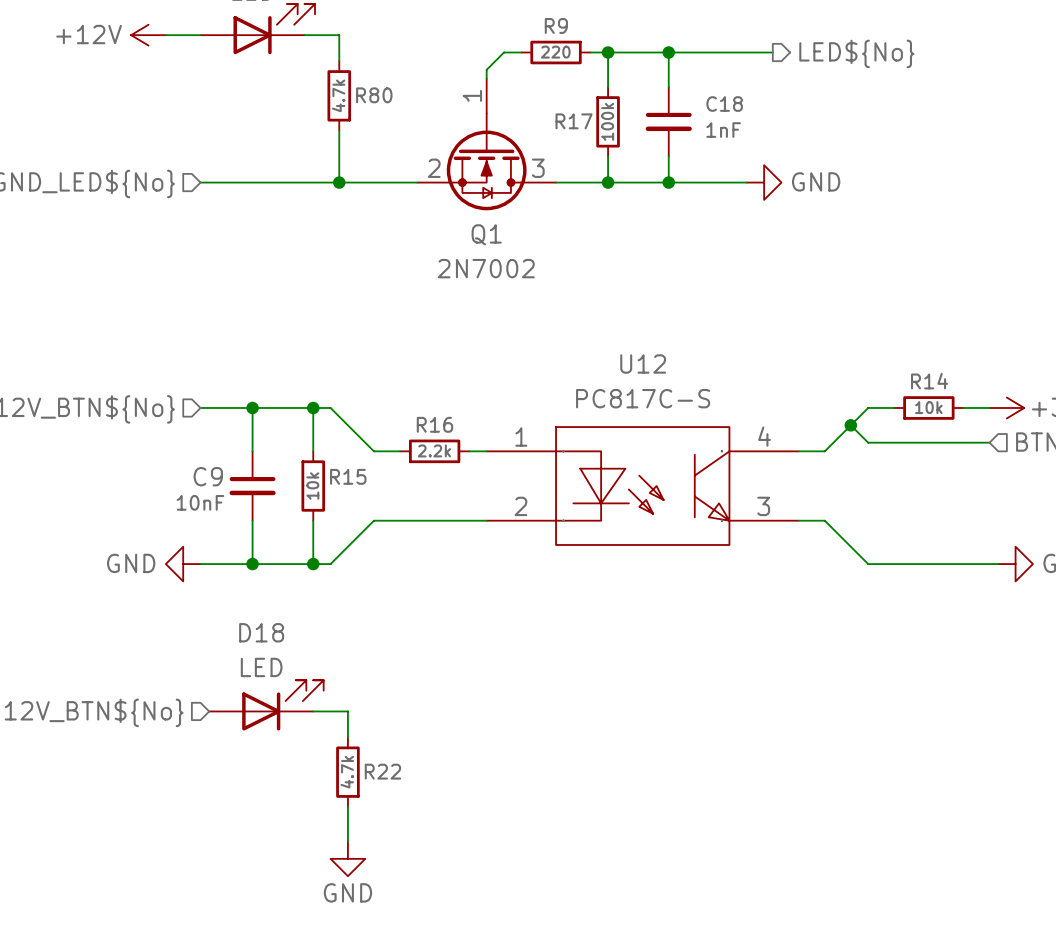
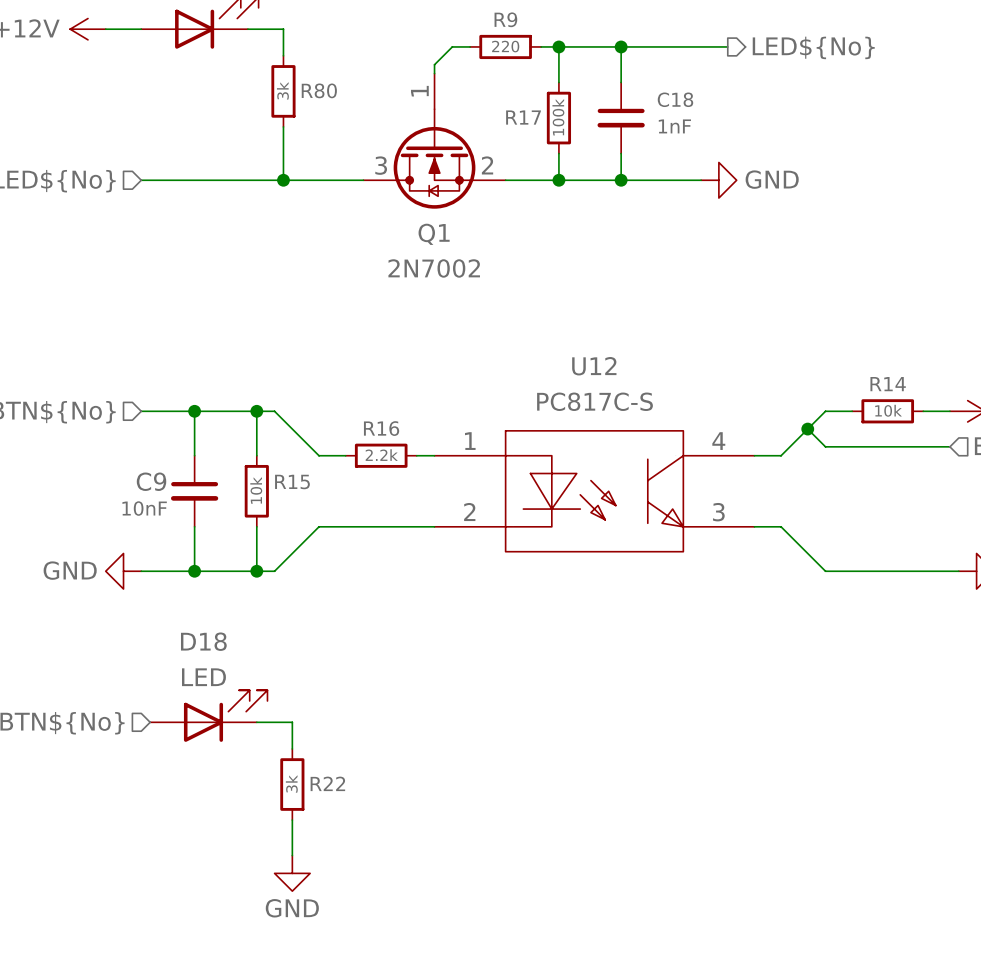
R80 value: 4.7k (338, 95) -> 3k (282, 90)
Q1 flip: as is (486, 161) -> left-right (434, 158)
R22 value: 4.7k (347, 772) -> 3k (291, 783)

